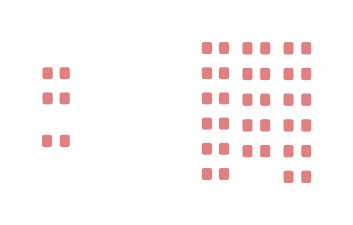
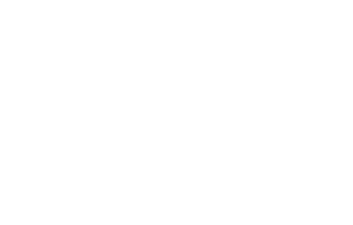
part: (215, 48) -> none
part: (256, 48) -> none
part: (297, 48) -> none
part: (56, 73) -> none
part: (215, 73) -> none
part: (256, 73) -> none
part: (297, 73) -> none
part: (56, 98) -> none
part: (215, 98) -> none
part: (256, 99) -> none
part: (297, 99) -> none
part: (215, 123) -> none
part: (256, 125) -> none
part: (297, 125) -> none
part: (55, 140) -> none
part: (215, 148) -> none
part: (256, 151) -> none
part: (297, 151) -> none
part: (215, 174) -> none
part: (297, 176) -> none

